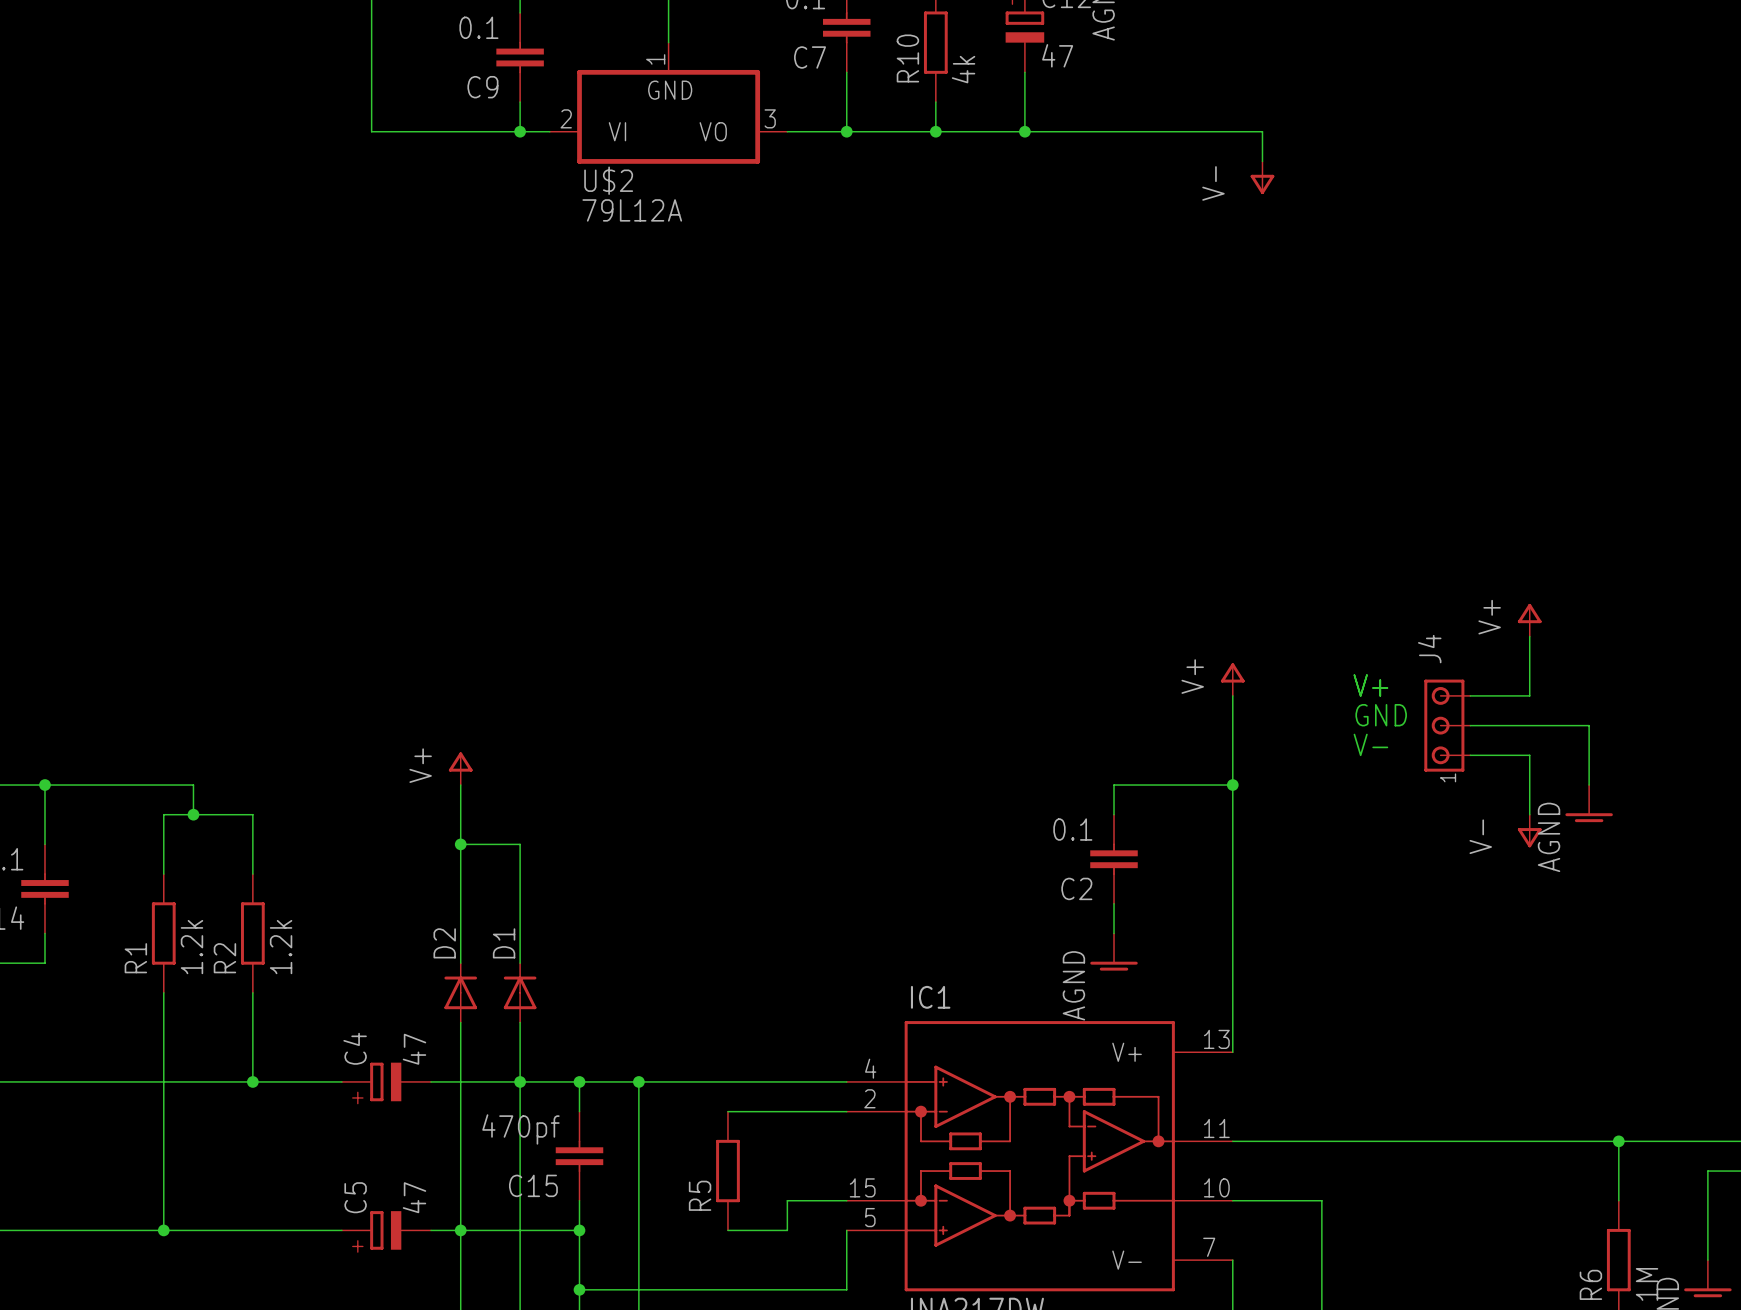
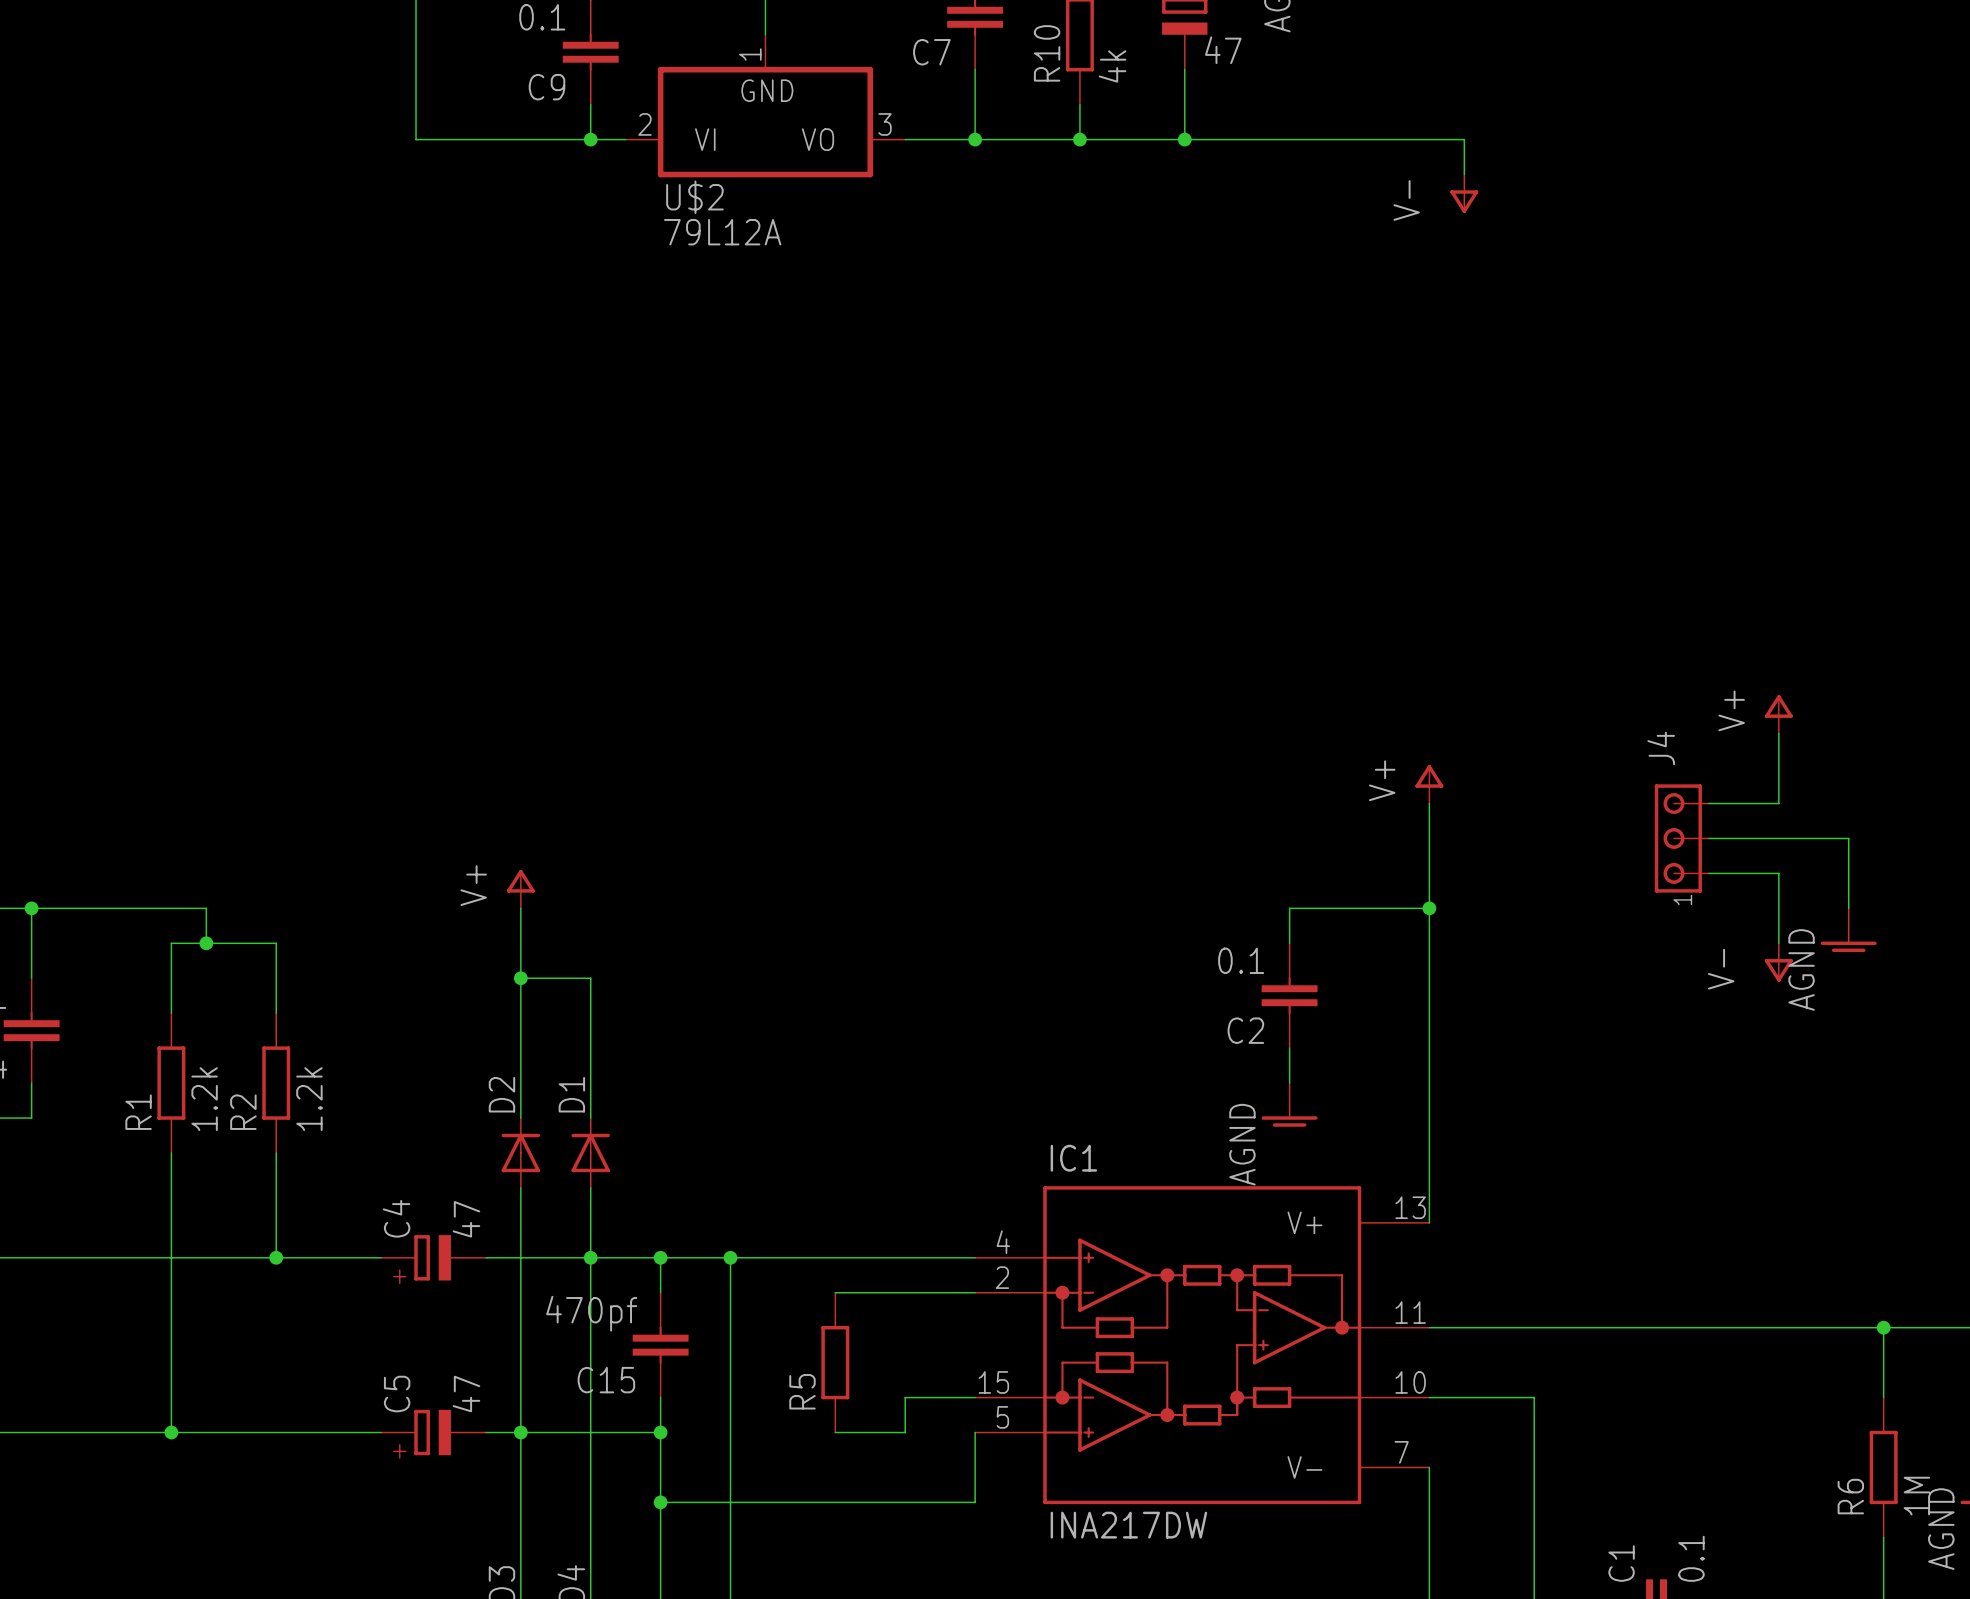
text: V+ (1370, 685) -> none
text: GND (1381, 715) -> none
text: V- (1370, 744) -> none

